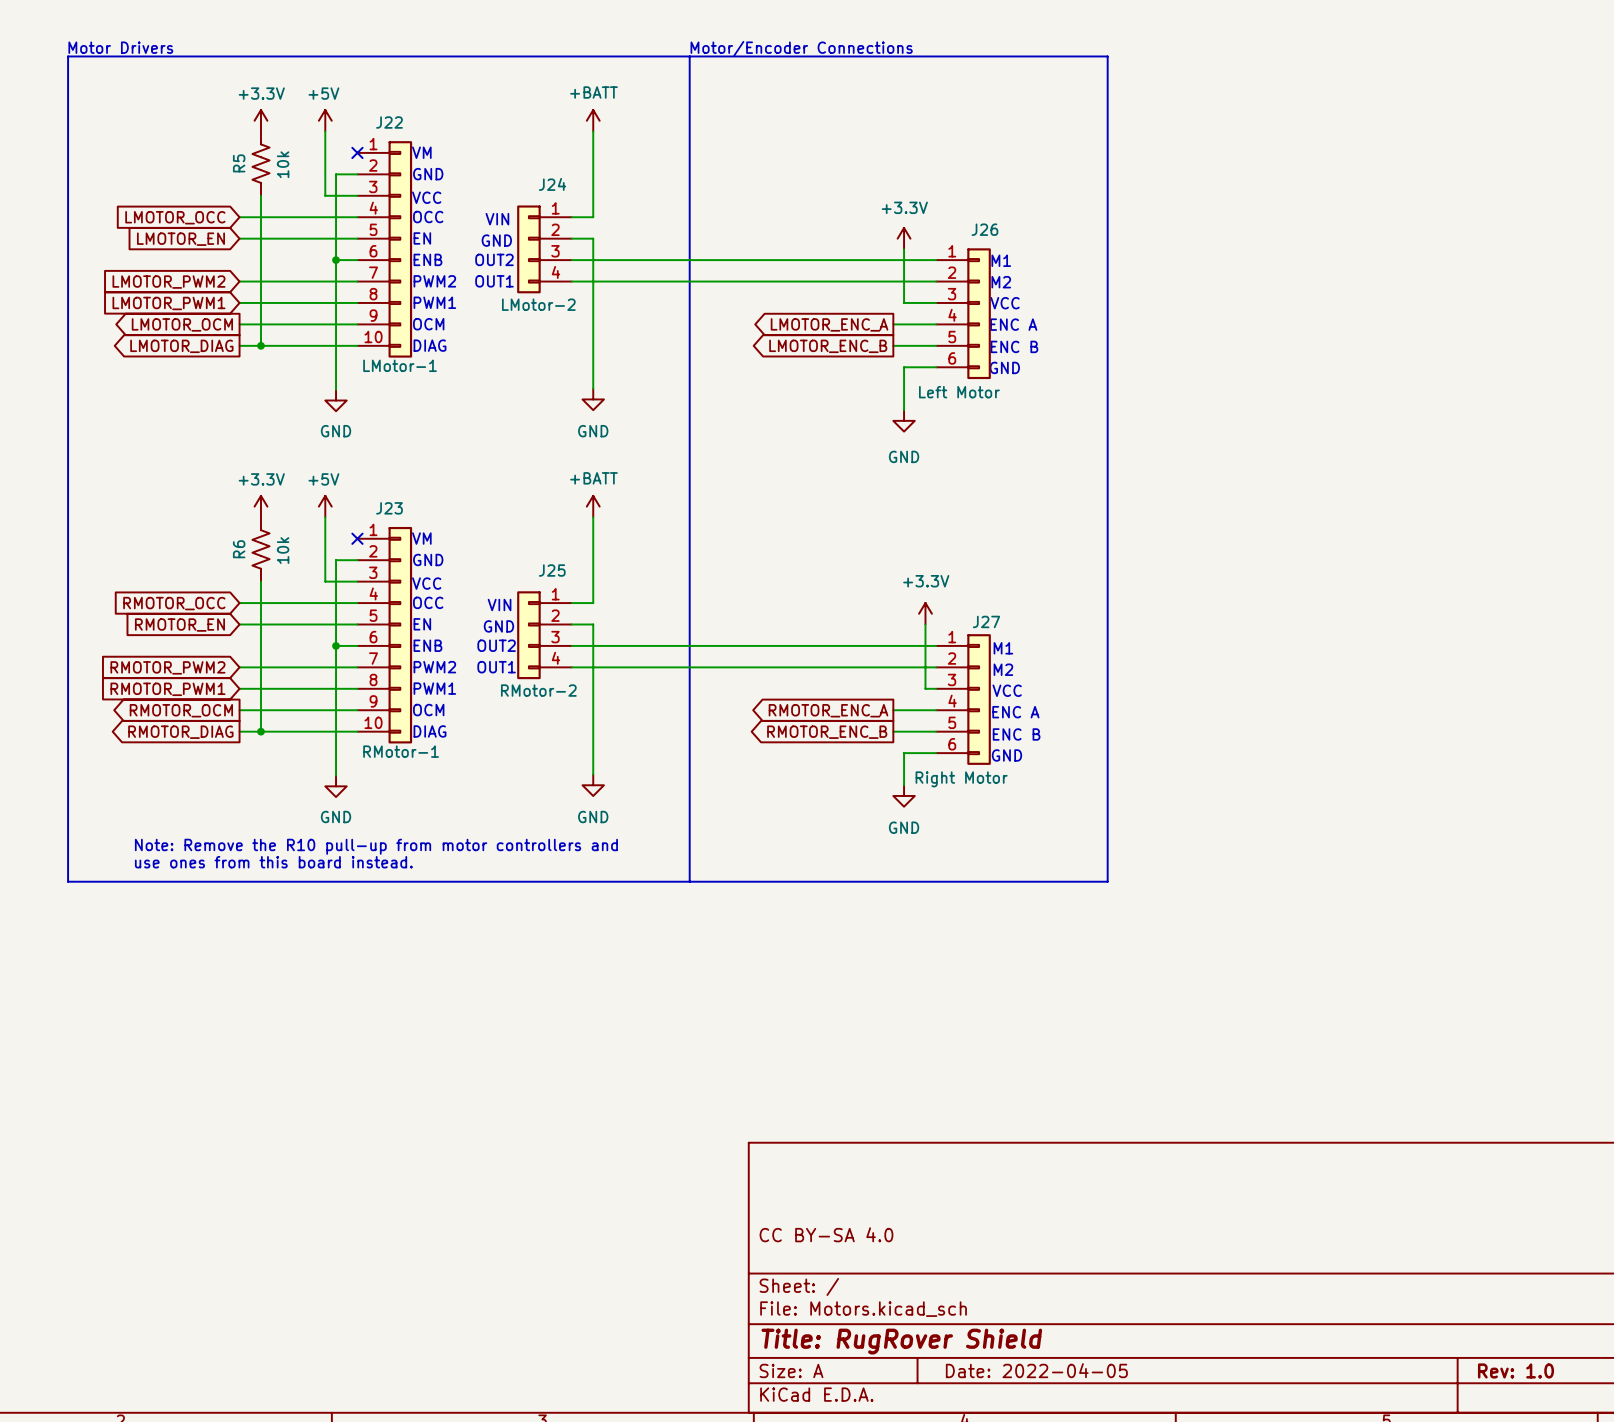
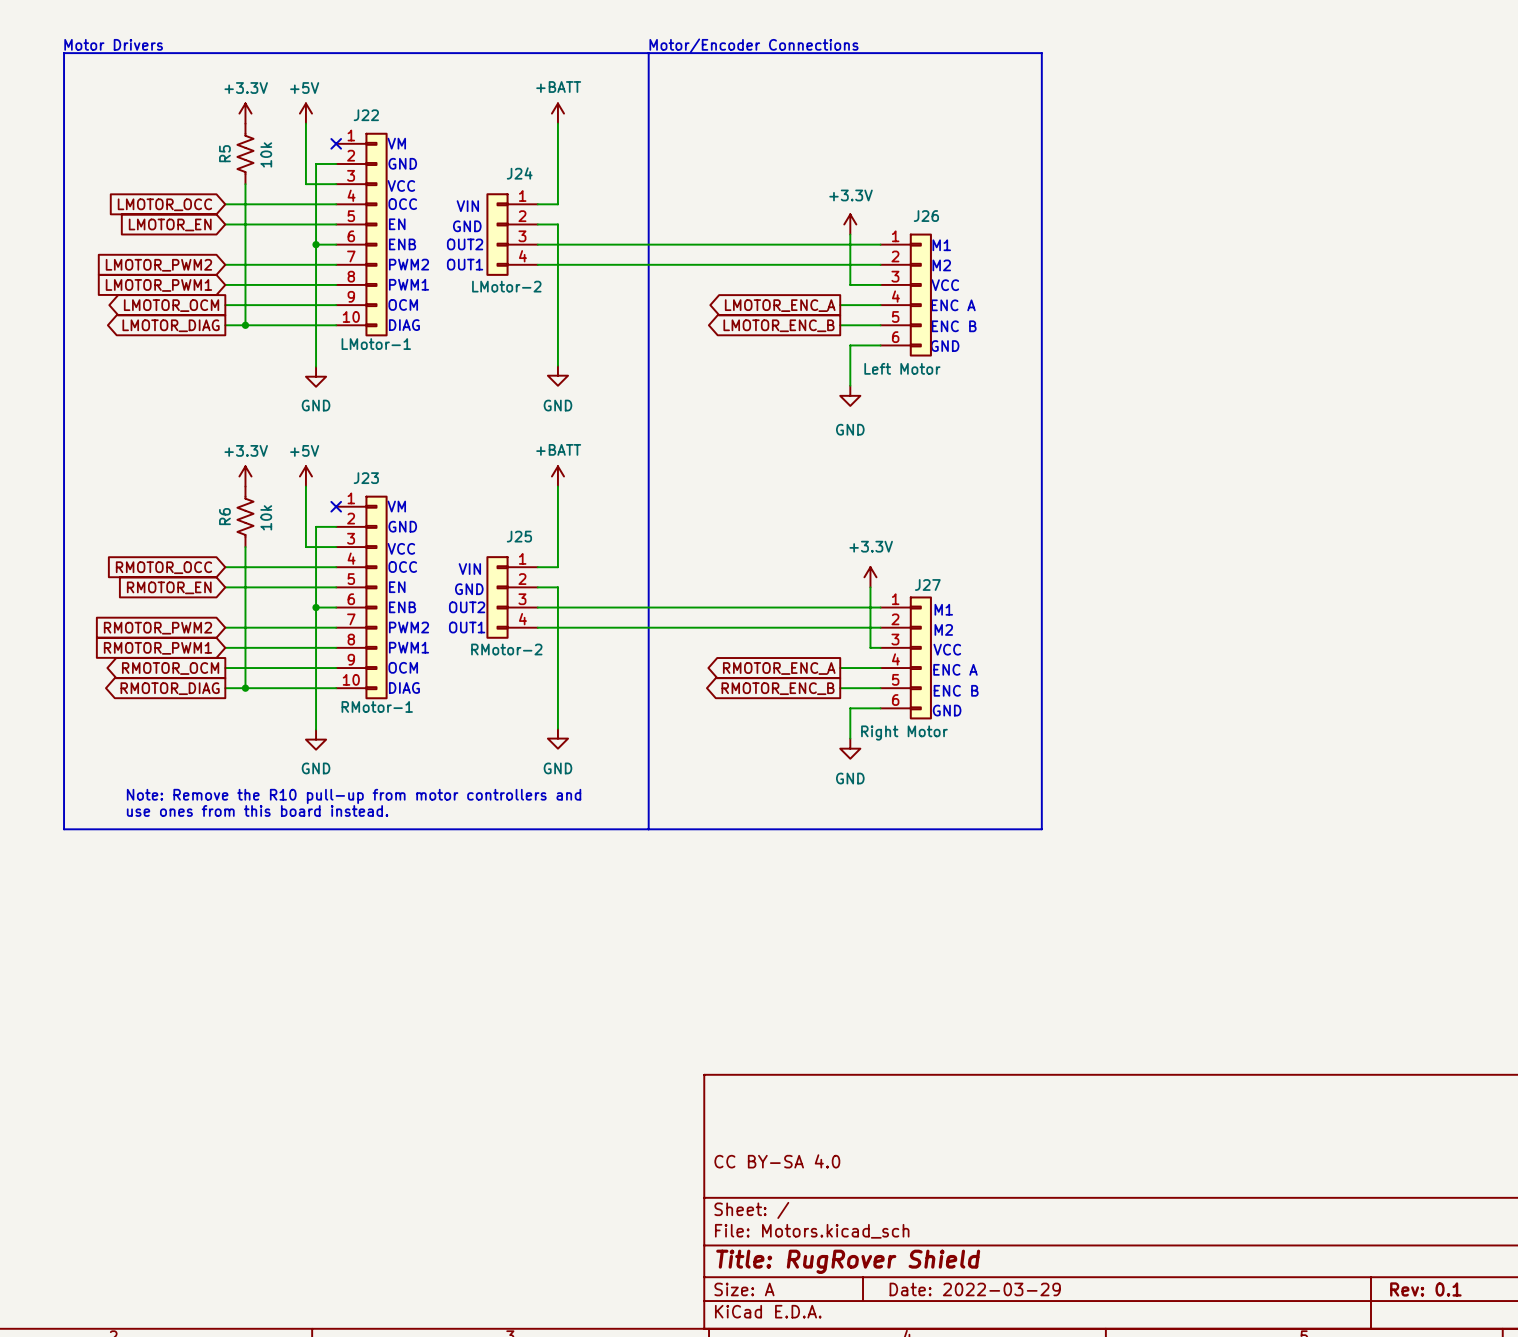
title block: Date: 2022-04-05 (1036, 1370) -> Date: 2022-03-29 (975, 1289)
title block: Rev: 1.0 (1515, 1370) -> Rev: 0.1 (1425, 1289)

